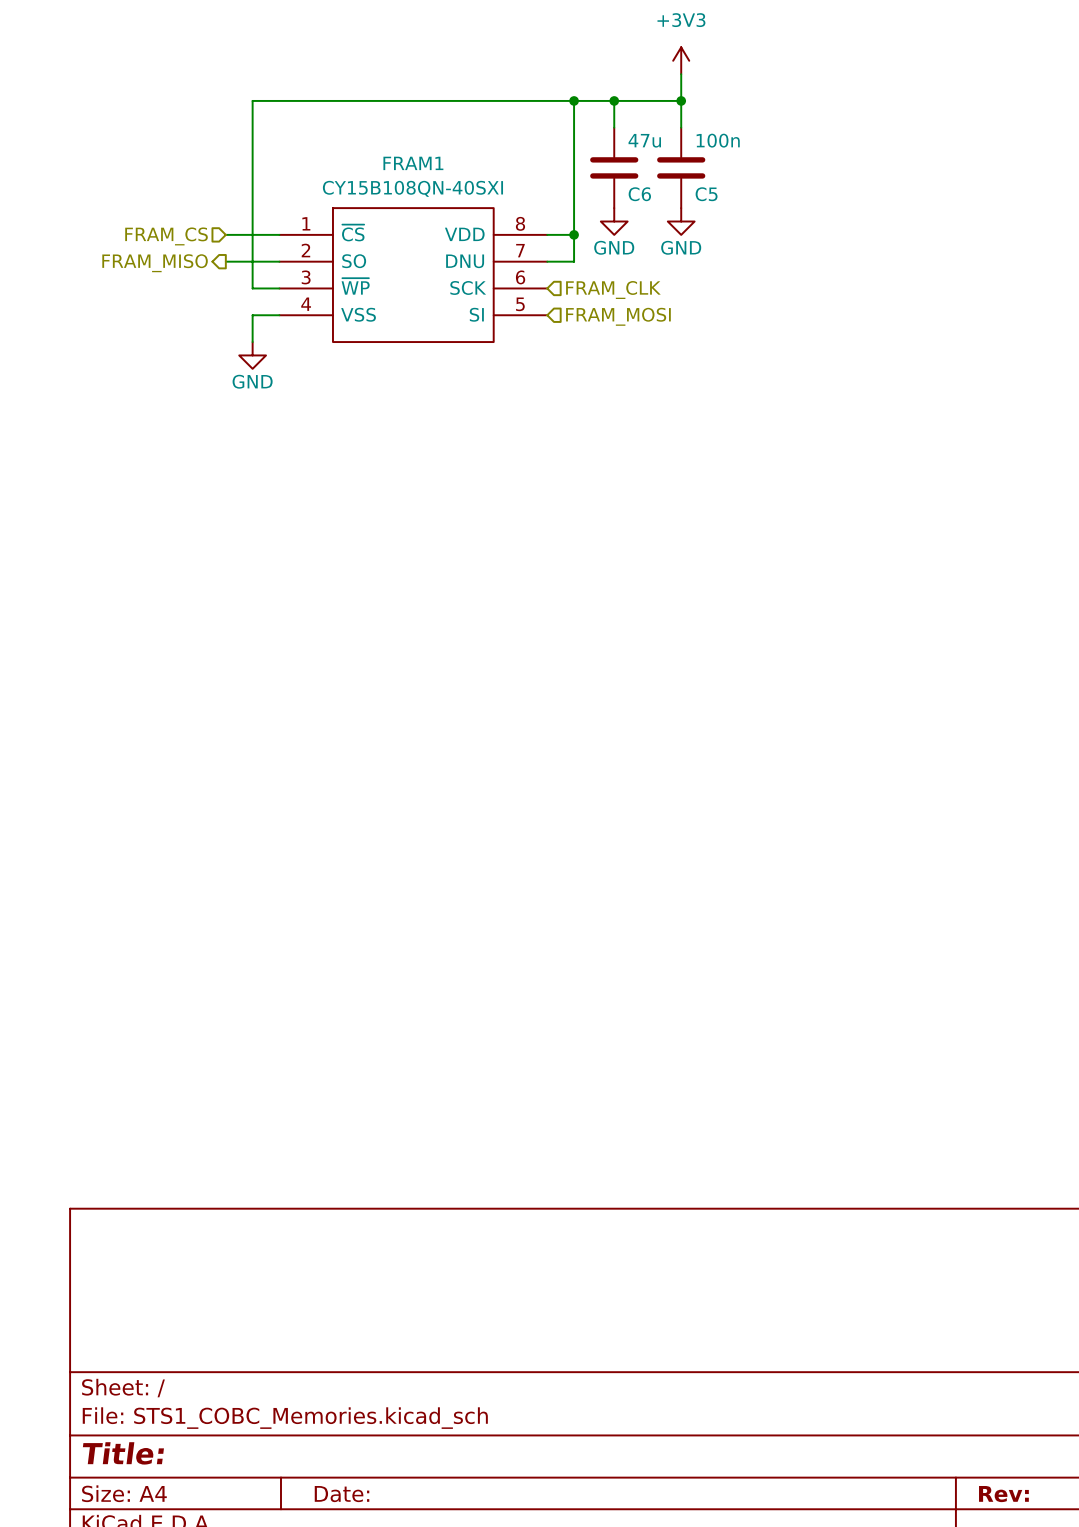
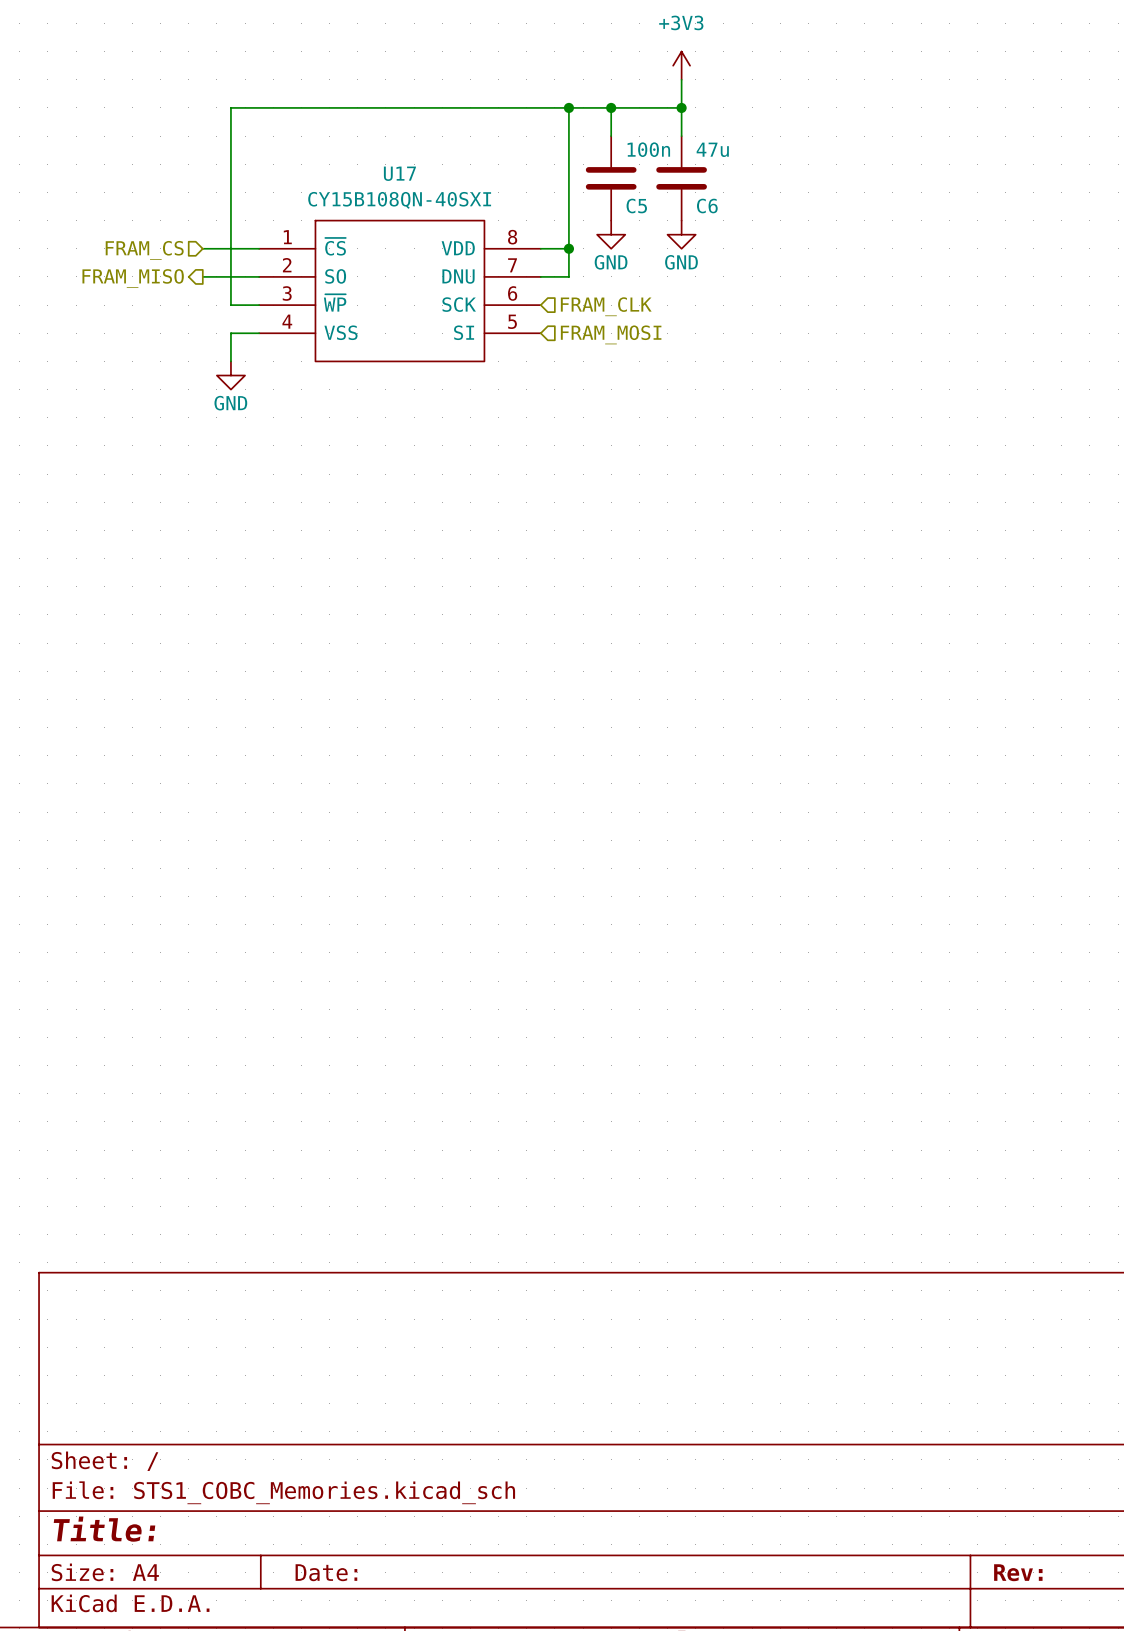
C6 value: 47u (644, 140) -> 100n (648, 149)
C5 value: 100n (718, 140) -> 47u (712, 149)
FRAM1 name: FRAM1 (413, 163) -> U17 (399, 173)
C6 name: C6 (639, 194) -> C5 (636, 206)
C5 name: C5 (706, 194) -> C6 (707, 206)

